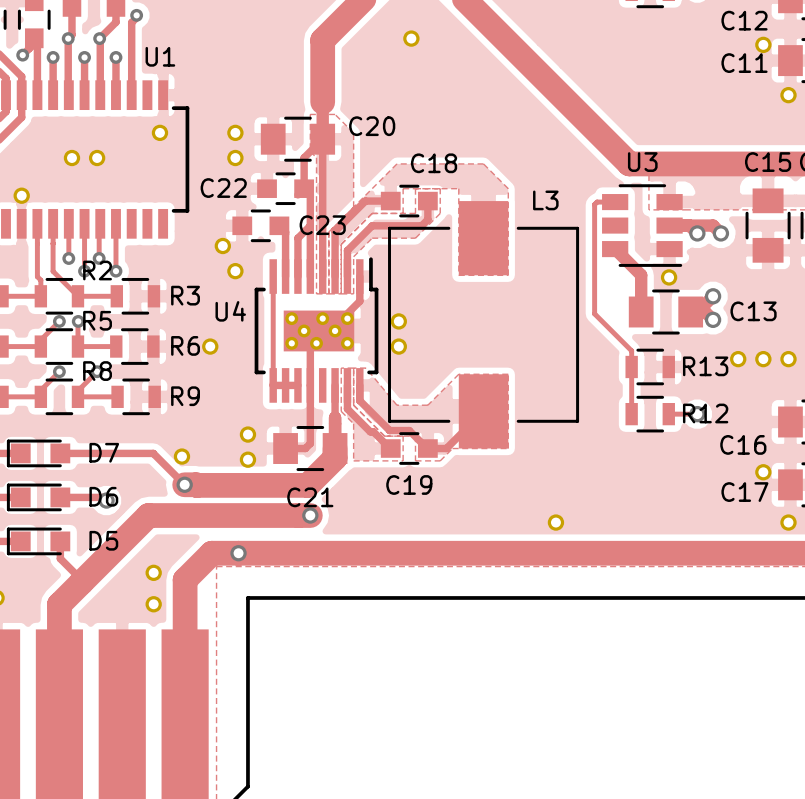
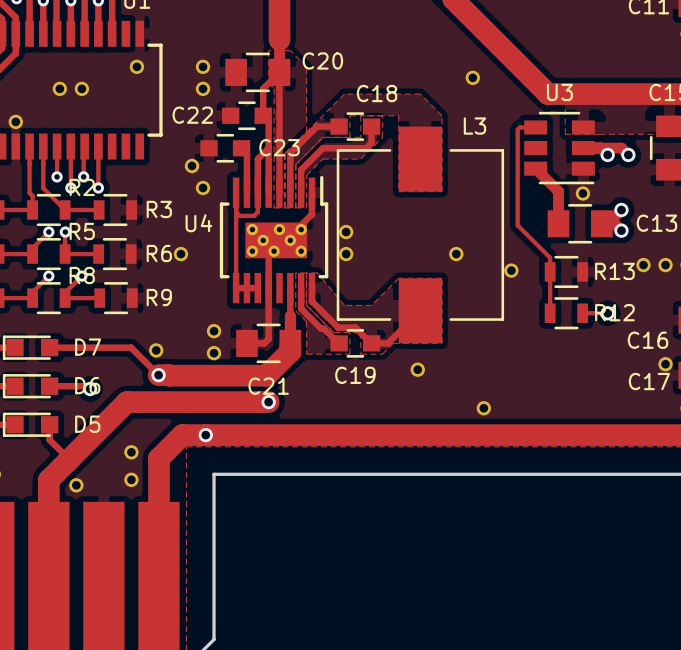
part: none -> (472, 77)
track: none -> (257, 192) (257, 212) (254, 215) (239, 215) (236, 212)
part: none -> (456, 254)
part: none -> (511, 270)
part: none -> (417, 369)
part: none -> (76, 485)

